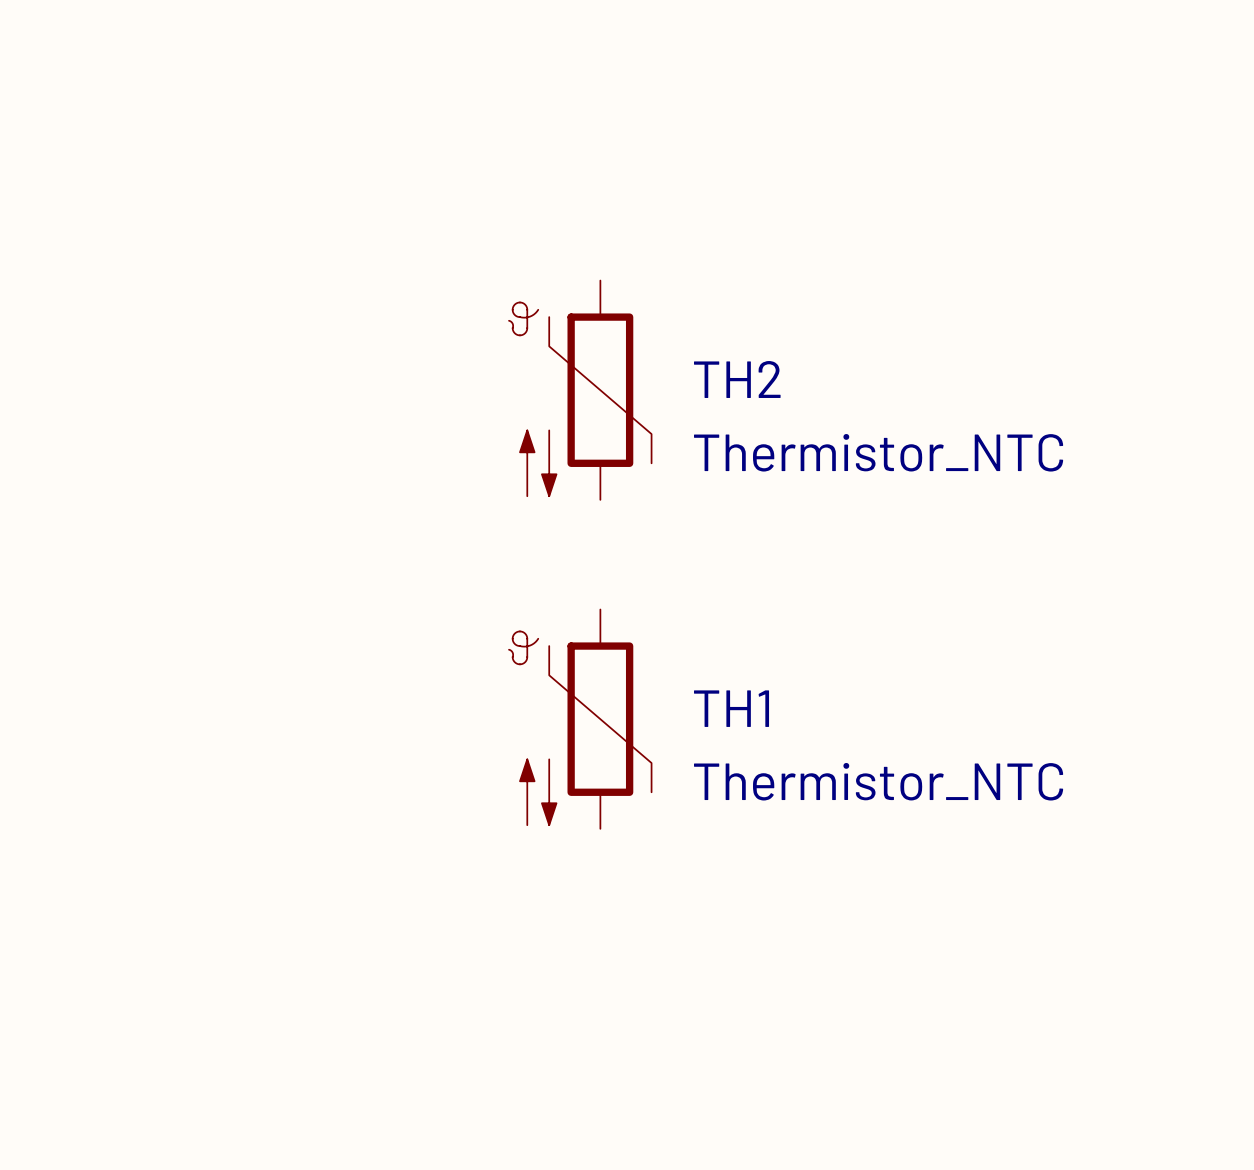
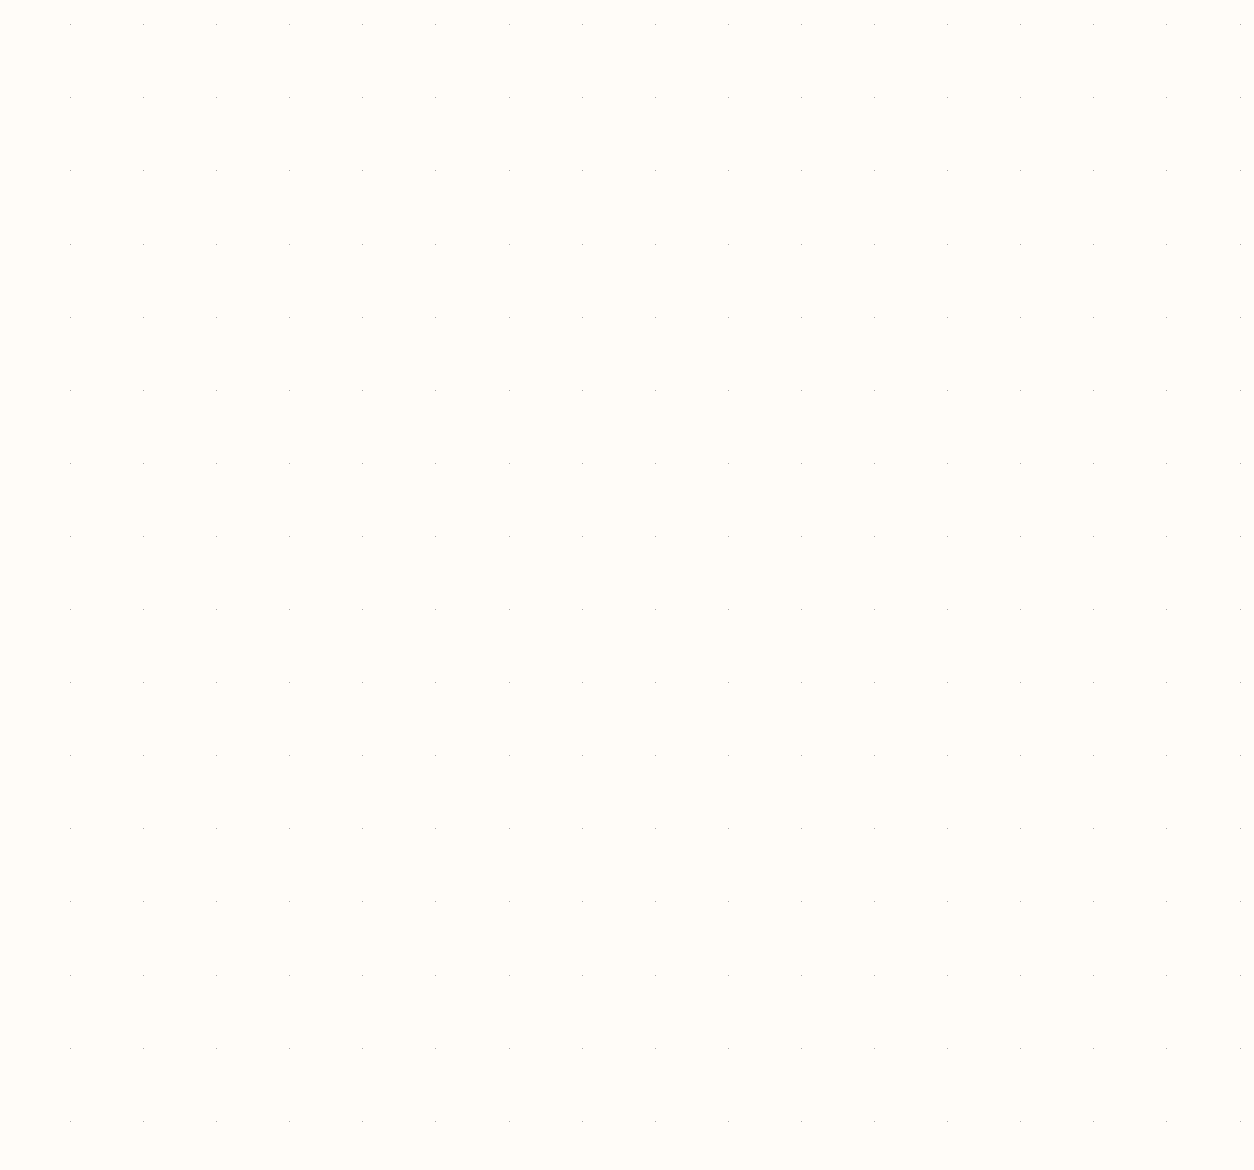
TH2: Thermistor_NTC (580, 390) -> none
TH1: Thermistor_NTC (580, 719) -> none

